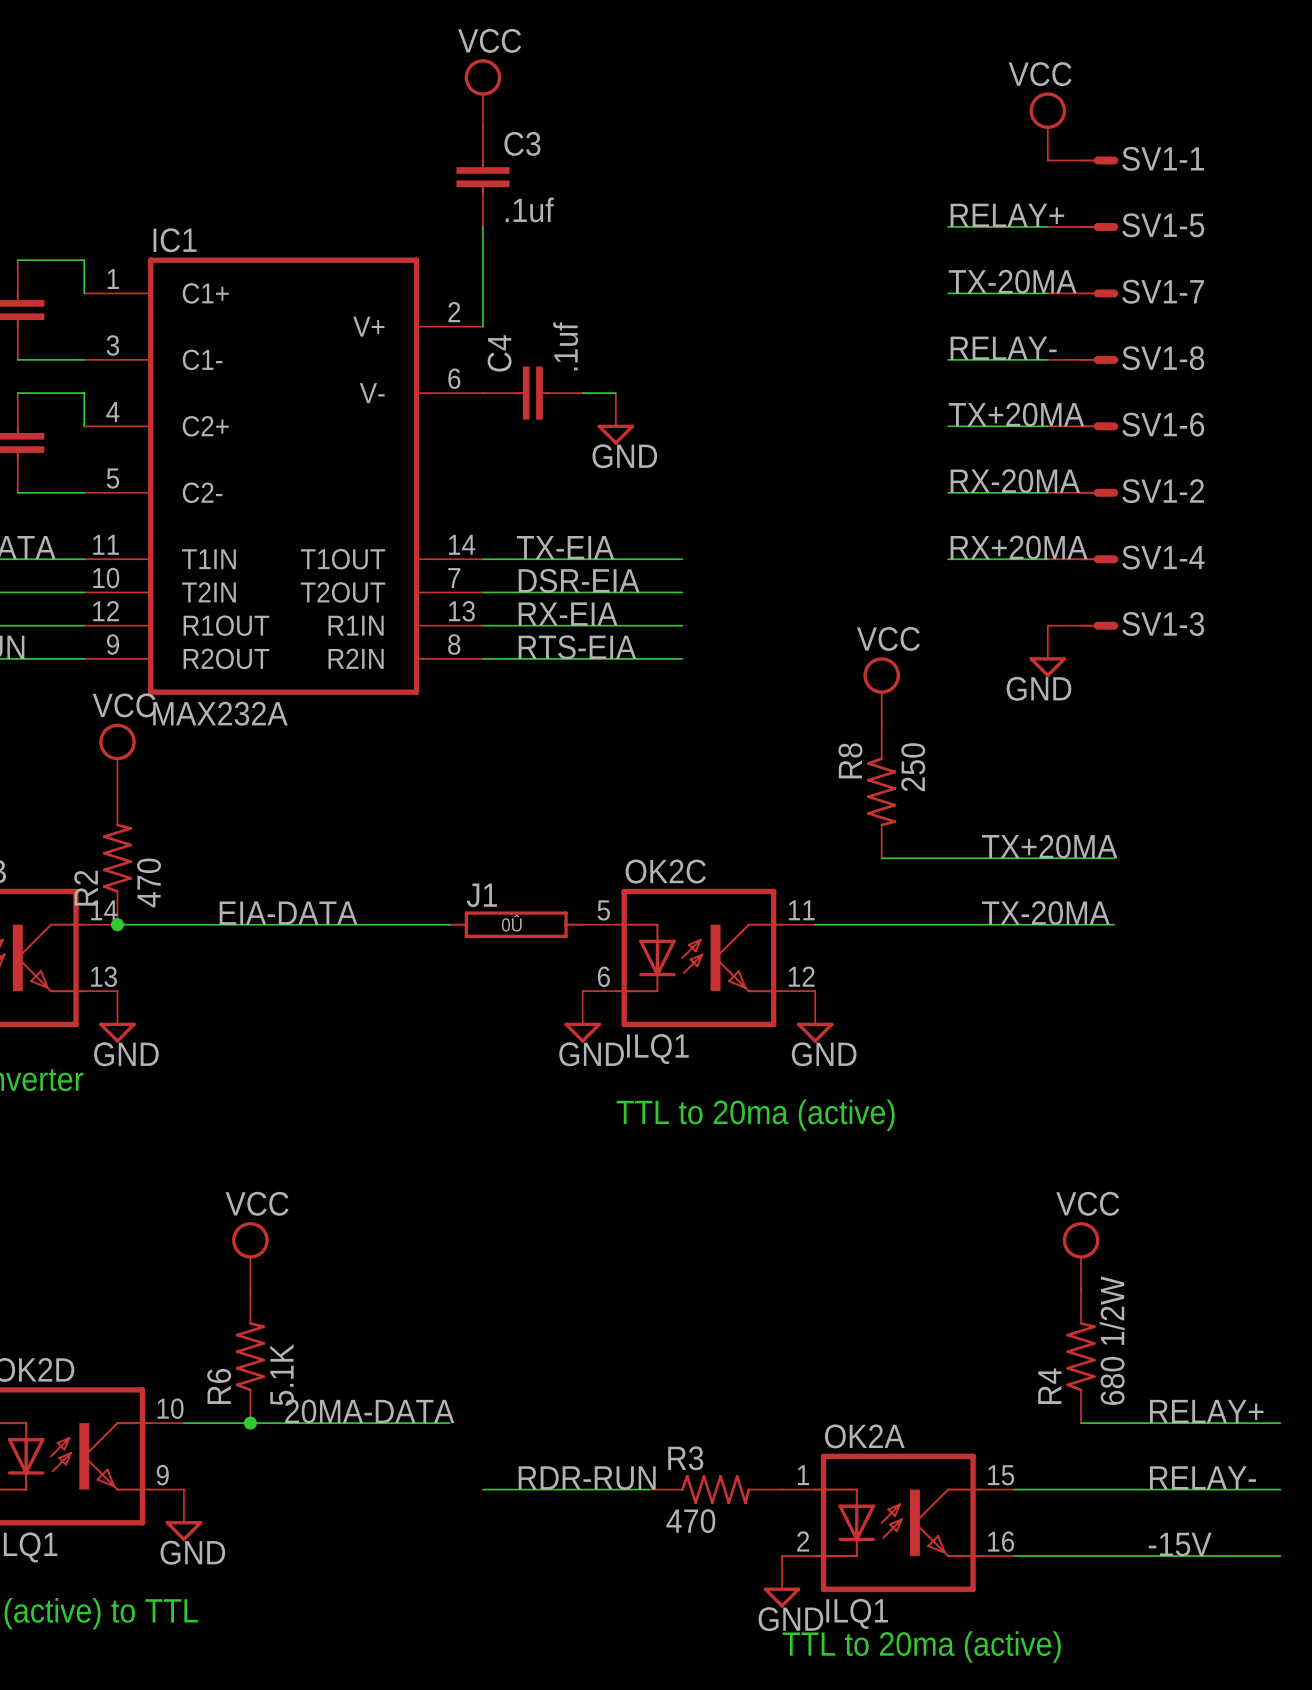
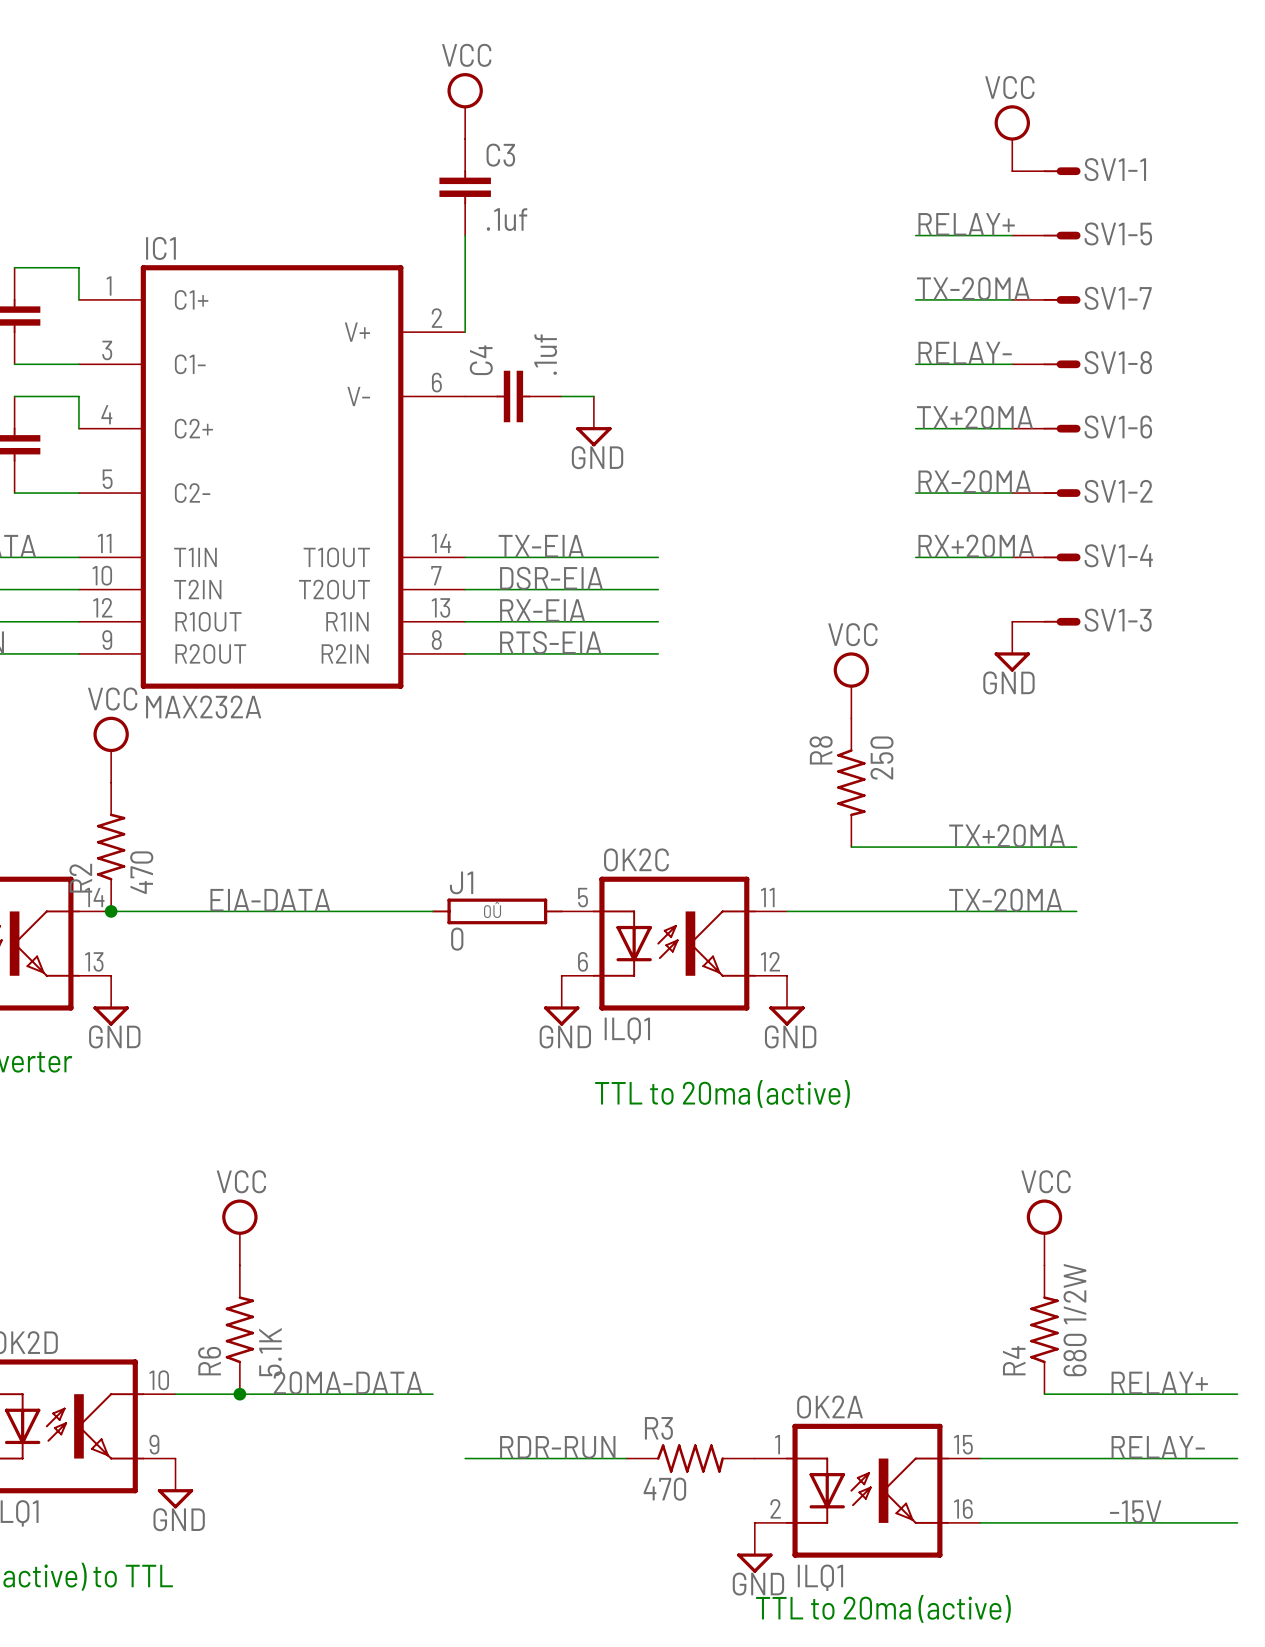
J1 value: none -> 0 (457, 939)

